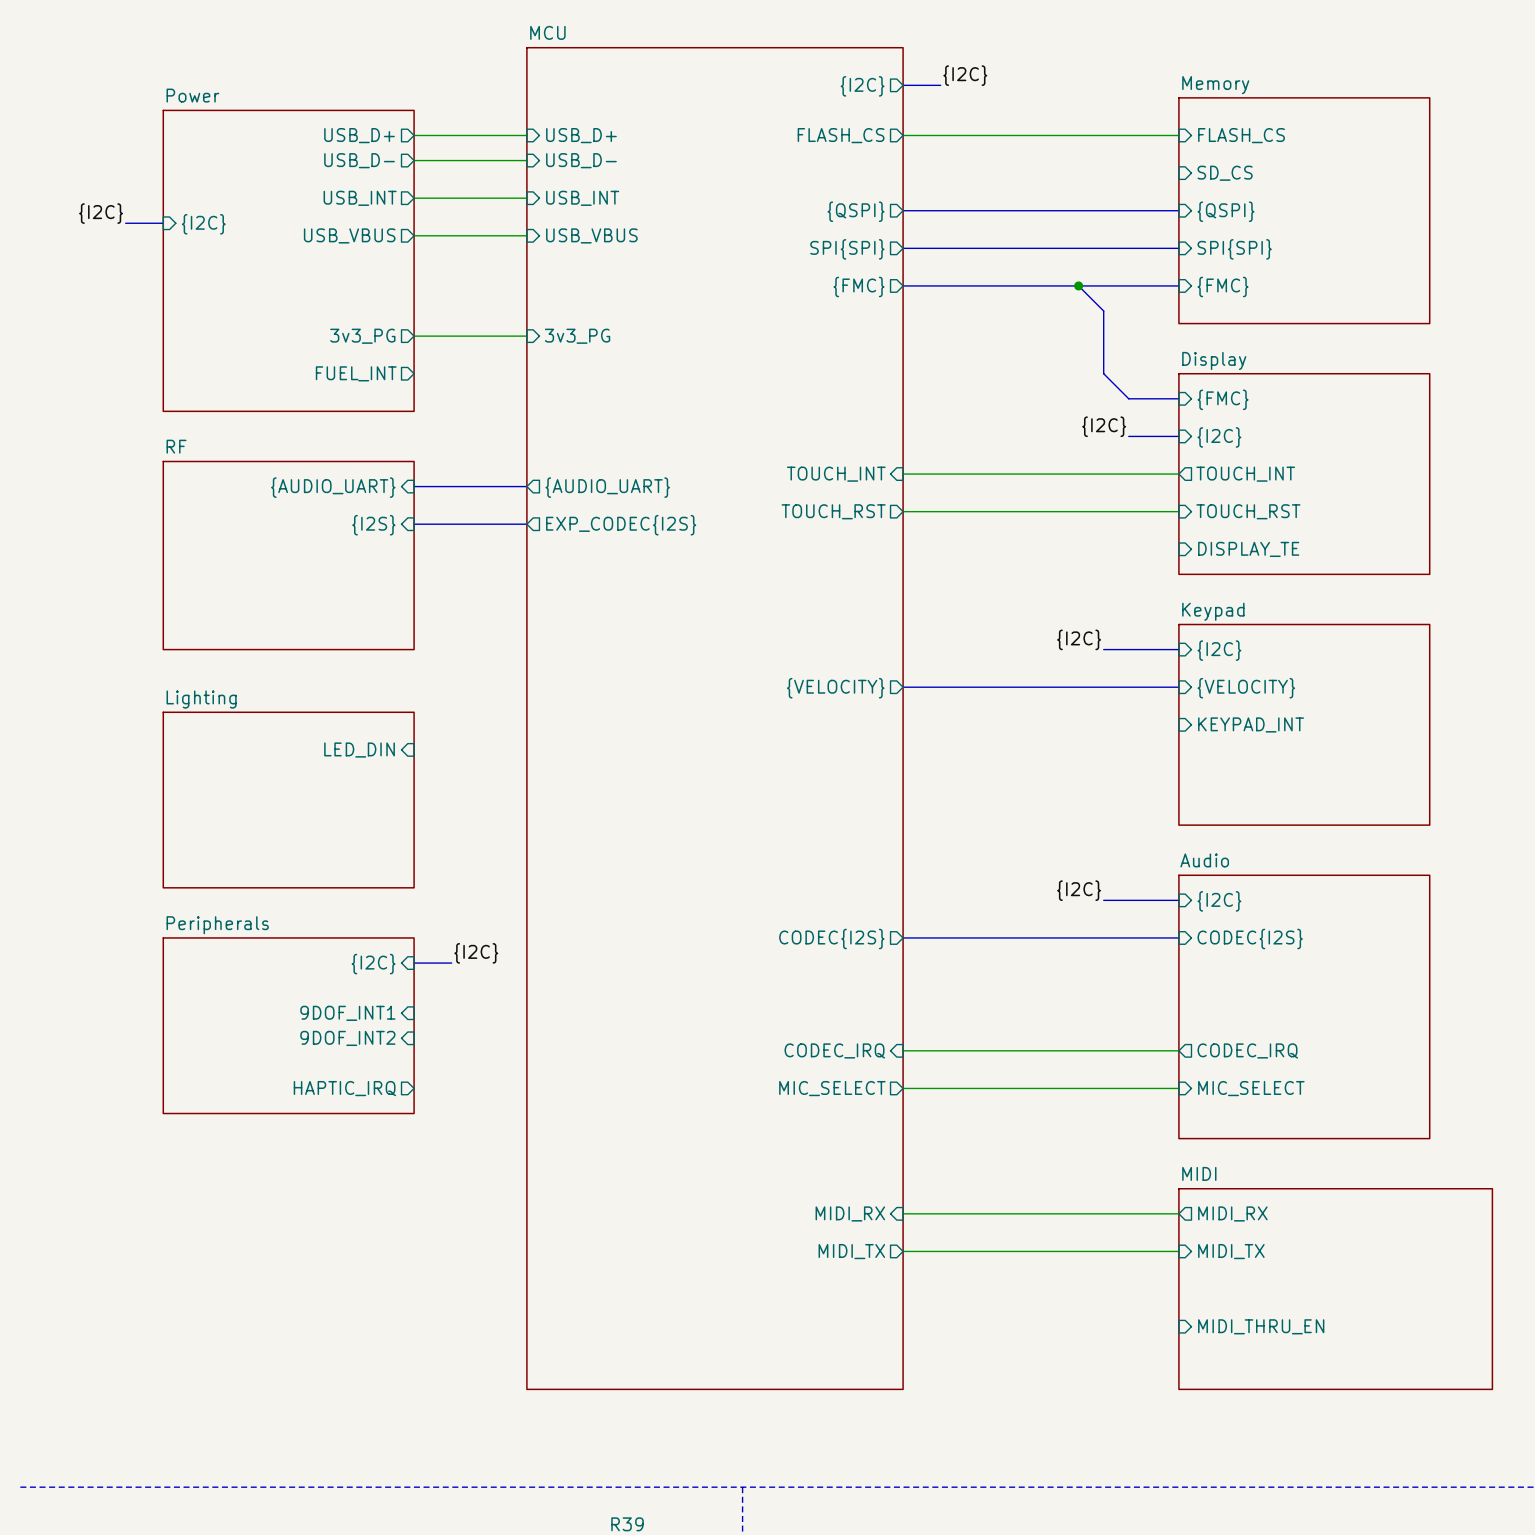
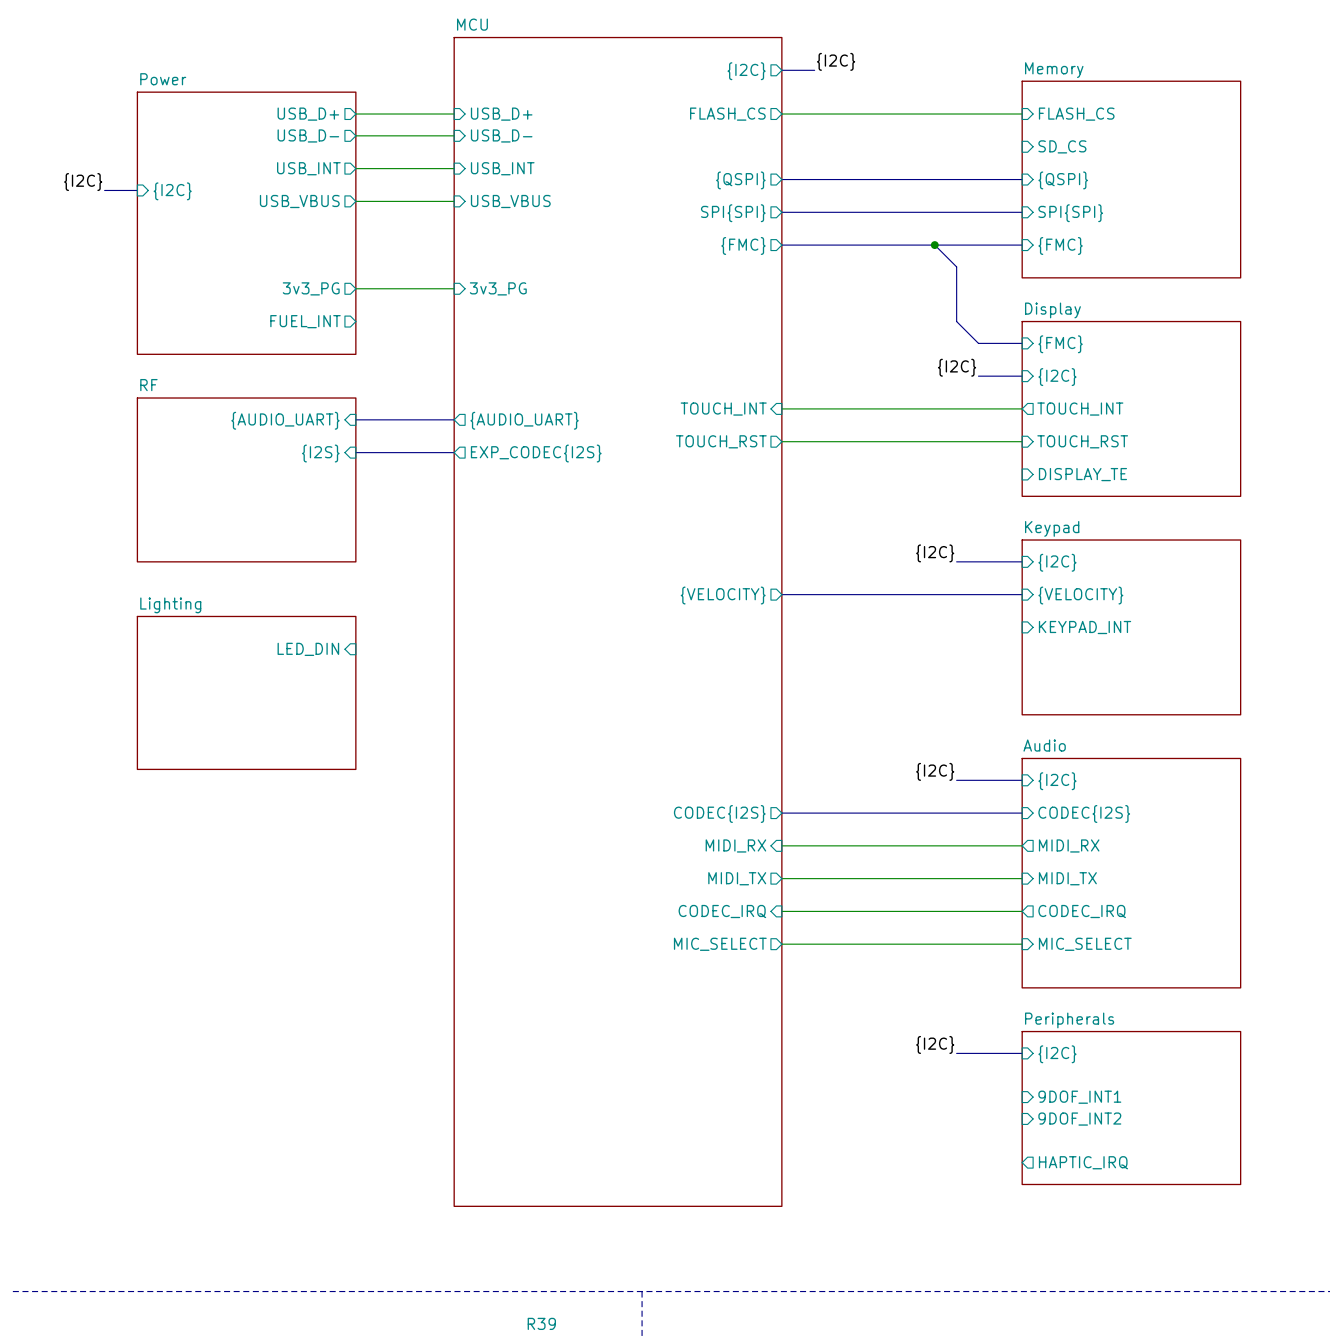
label: {I2C} (476, 953) -> none
bus: (414, 963) (451, 963) -> none
sheet pin: {I2C} (373, 964) -> none
sheet pin: none -> MIDI_RX (735, 845)
sheet pin: none -> MIDI_RX (1069, 845)
sheet pin: 9DOF_INT1 (347, 1013) -> none
sheet pin: none -> MIDI_TX (737, 878)
sheet pin: none -> MIDI_TX (1067, 878)
sheet Peripherals: (288, 1025) -> none
sheet pin: 9DOF_INT2 (347, 1038) -> none
sheet pin: HAPTIC_IRQ (344, 1088) -> none
label: none -> {I2C} (935, 1044)
sheet pin: MIDI_RX (850, 1213) -> none
wire: (903, 1213) (1178, 1213) -> (781, 845) (1022, 845)
bus: none -> (956, 1053) (1022, 1053)
sheet pin shape: output (1232, 1213) -> input (1057, 1054)
sheet pin: MIDI_RX (1232, 1213) -> {I2C} (1057, 1054)
sheet pin: MIDI_TX (851, 1251) -> none
wire: (903, 1251) (1178, 1251) -> (781, 878) (1022, 878)
sheet pin: MIDI_TX (1231, 1251) -> none
sheet pin: none -> 9DOF_INT1 (1079, 1097)
sheet Peripherals: none -> (1131, 1108)
sheet pin: none -> 9DOF_INT2 (1079, 1119)
sheet MIDI: (1335, 1289) -> none
sheet pin: MIDI_THRU_EN (1261, 1326) -> none
sheet pin: none -> HAPTIC_IRQ (1083, 1162)

